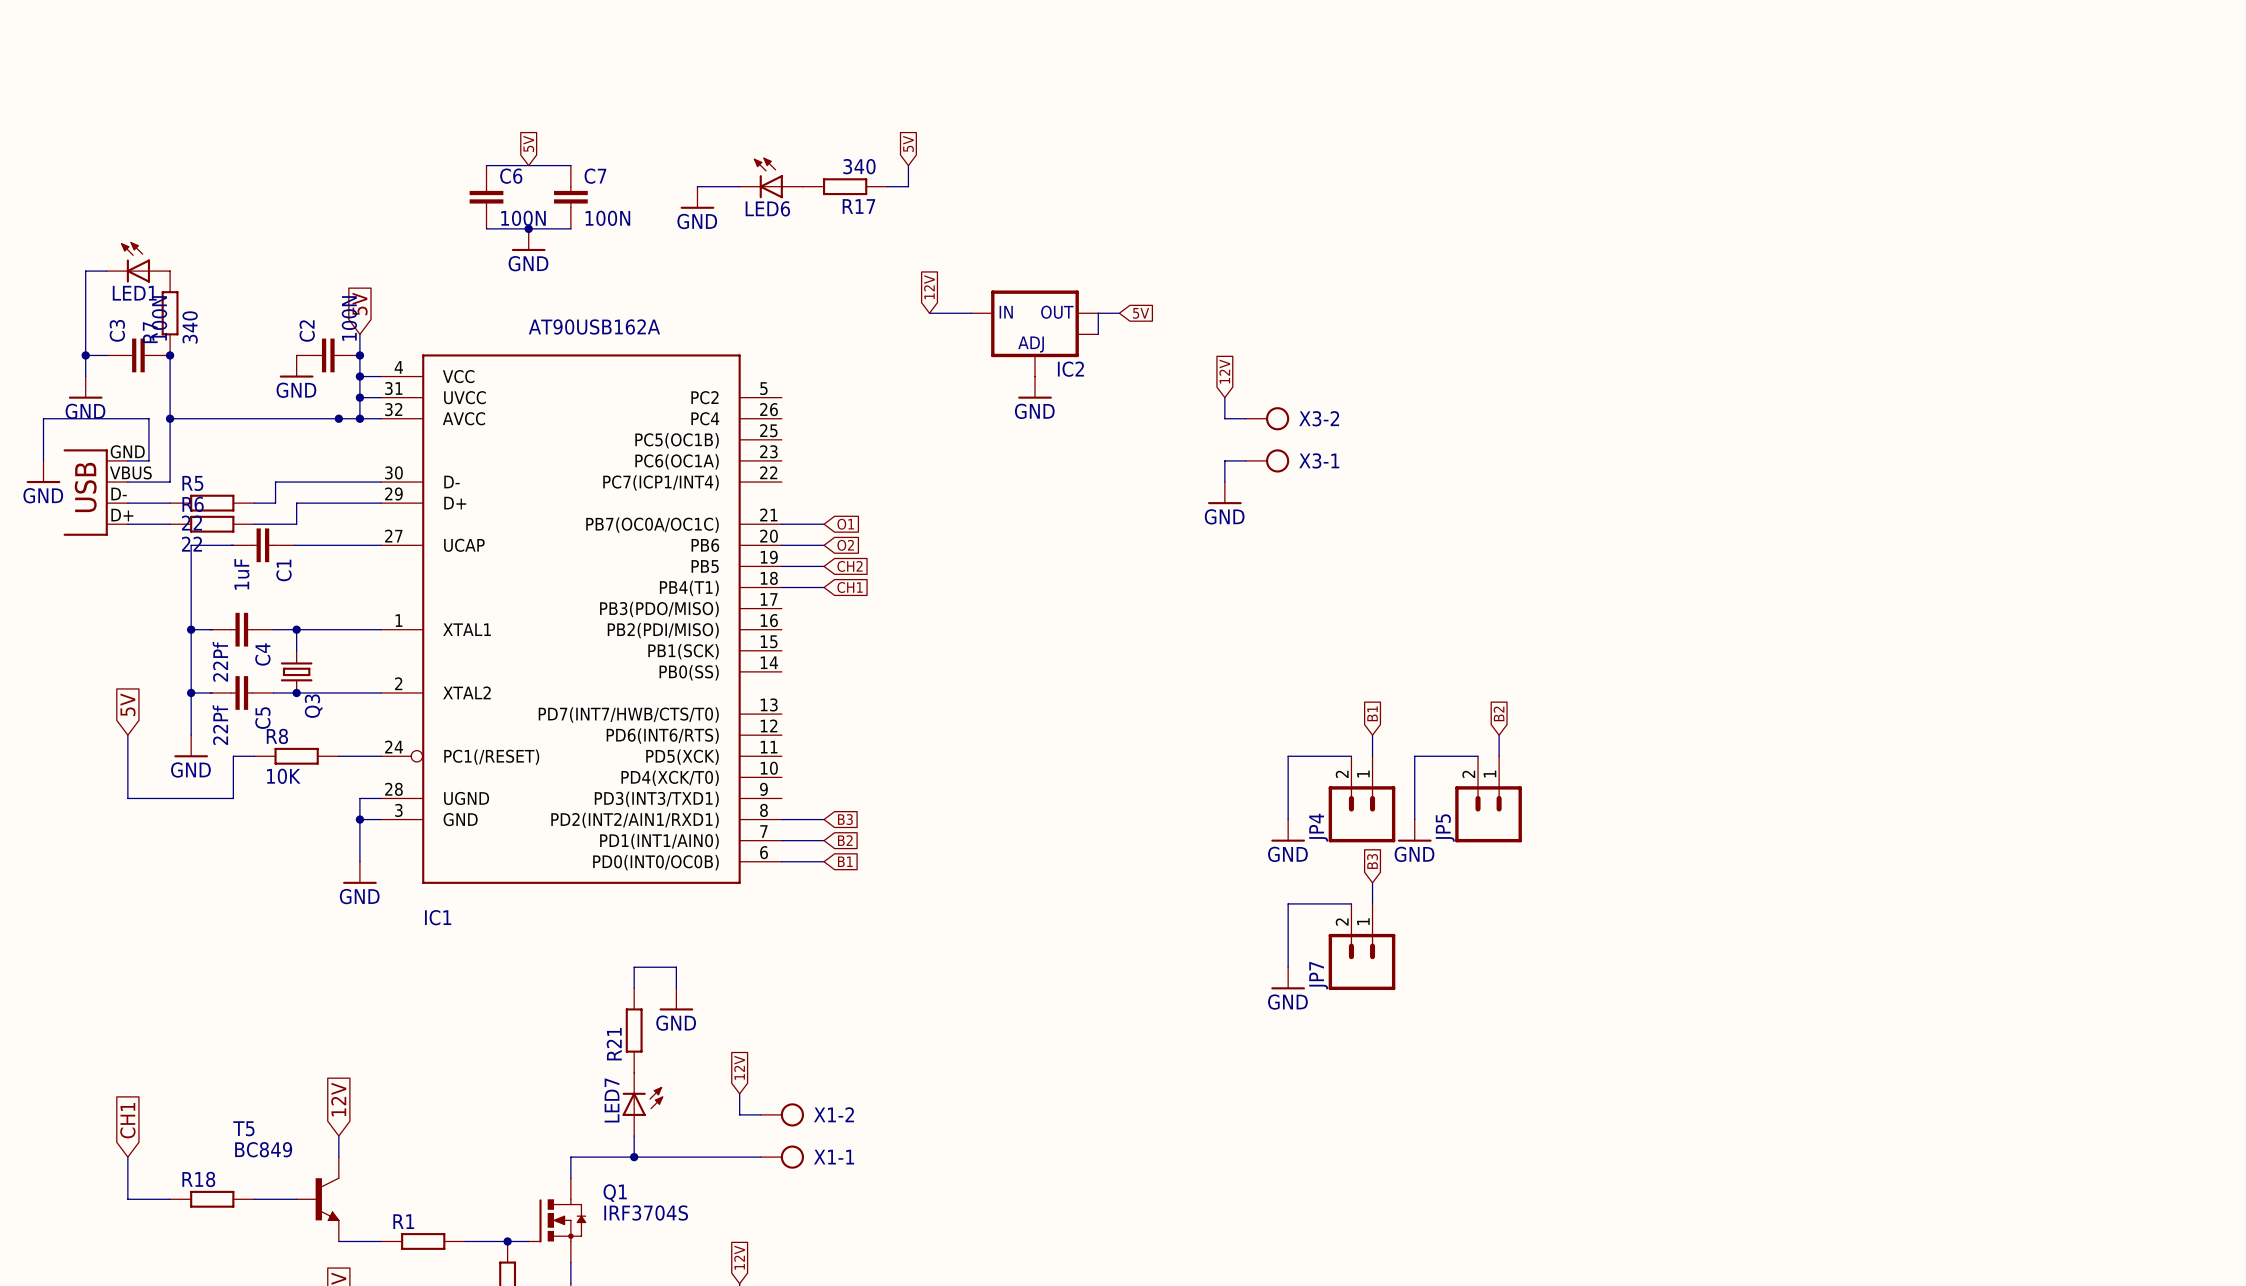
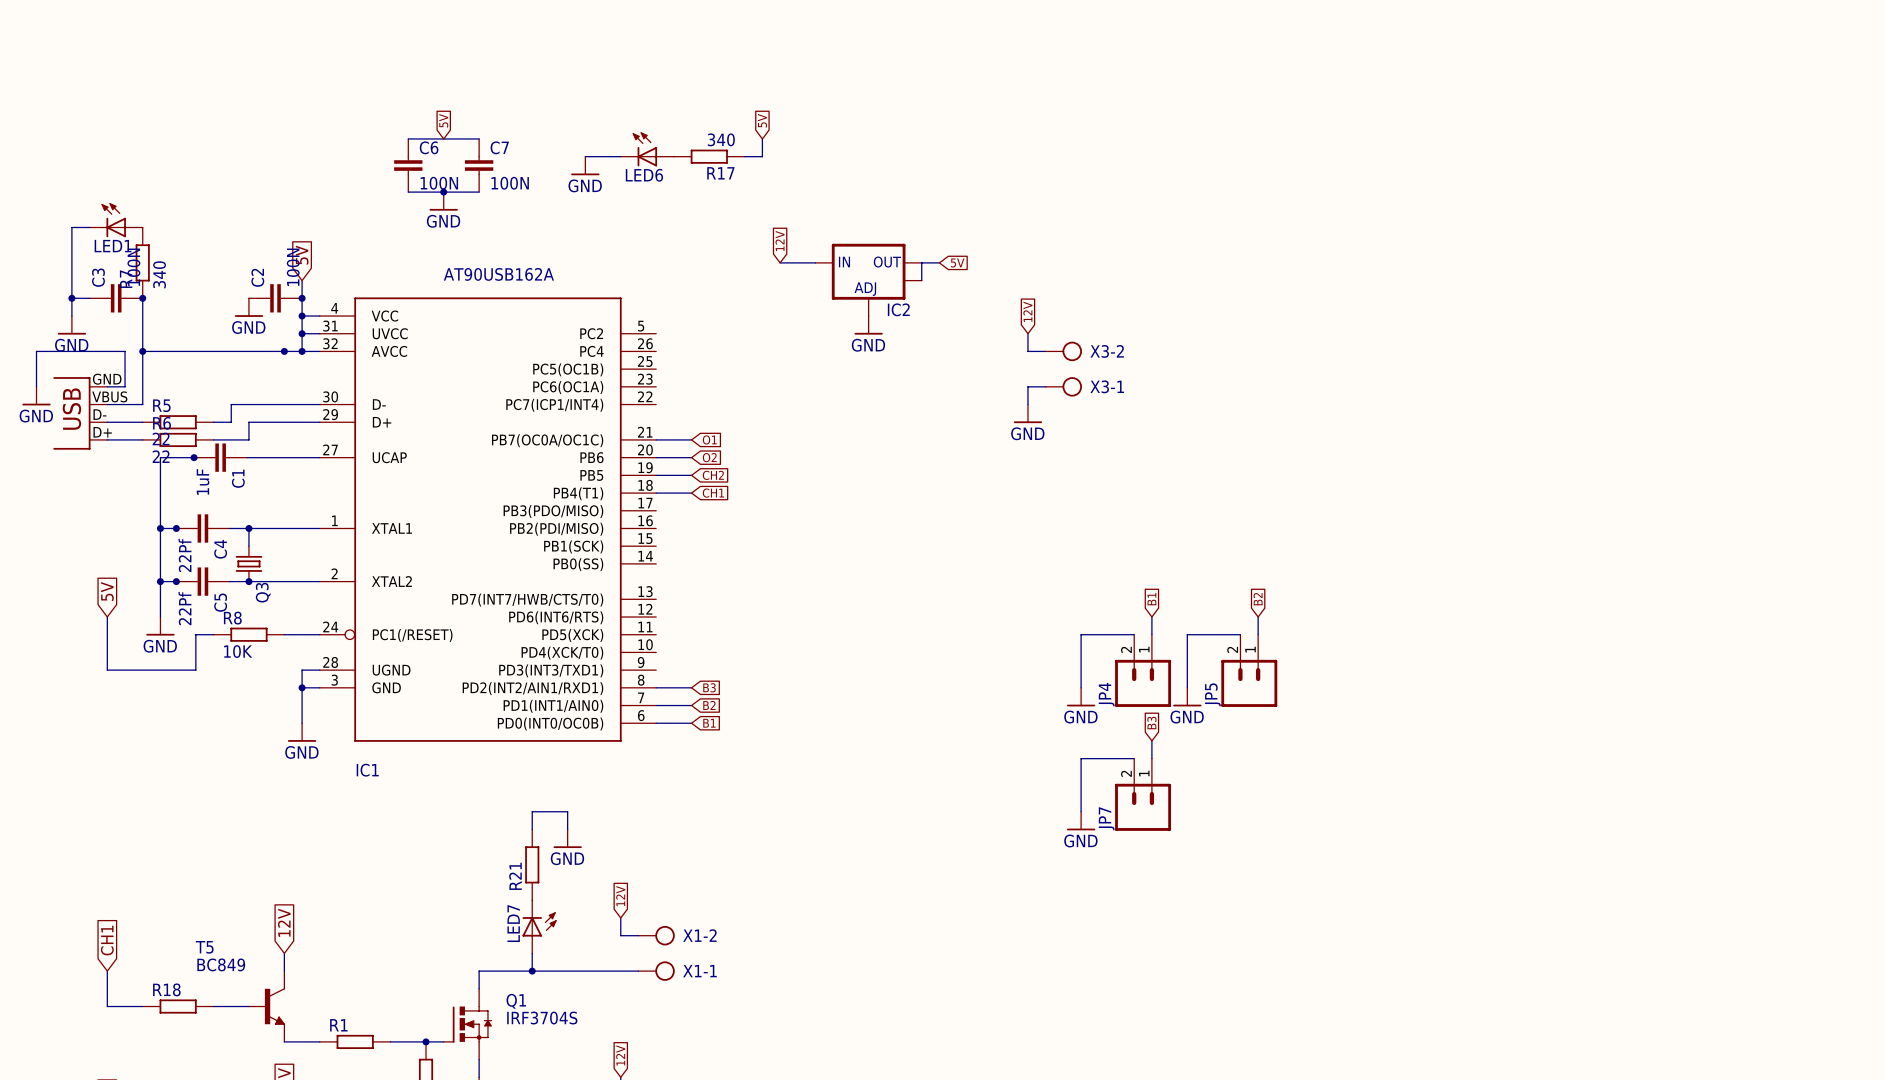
junction: none -> (194, 457)
junction: none -> (176, 528)
junction: none -> (176, 581)

